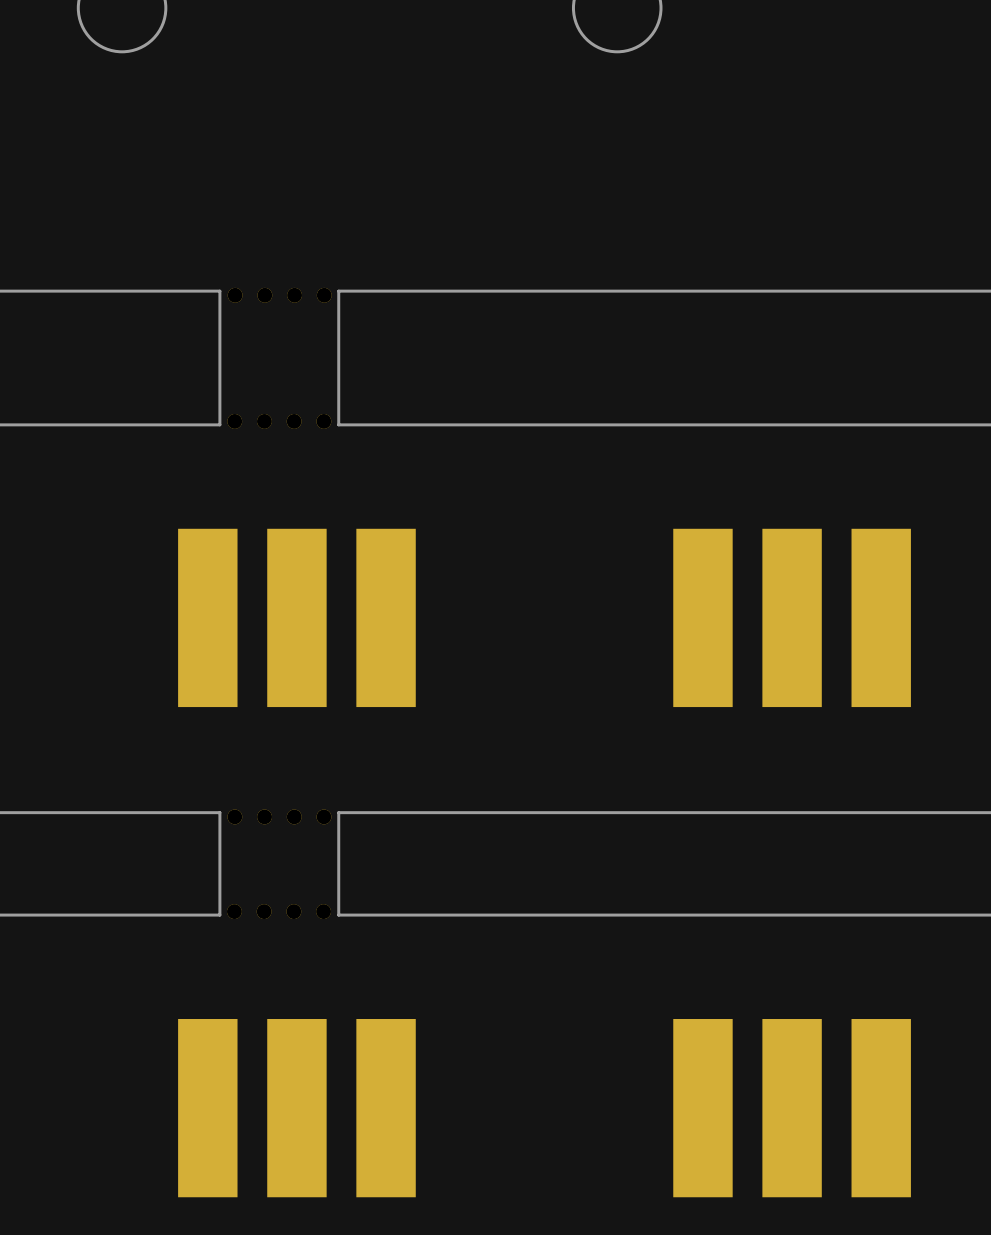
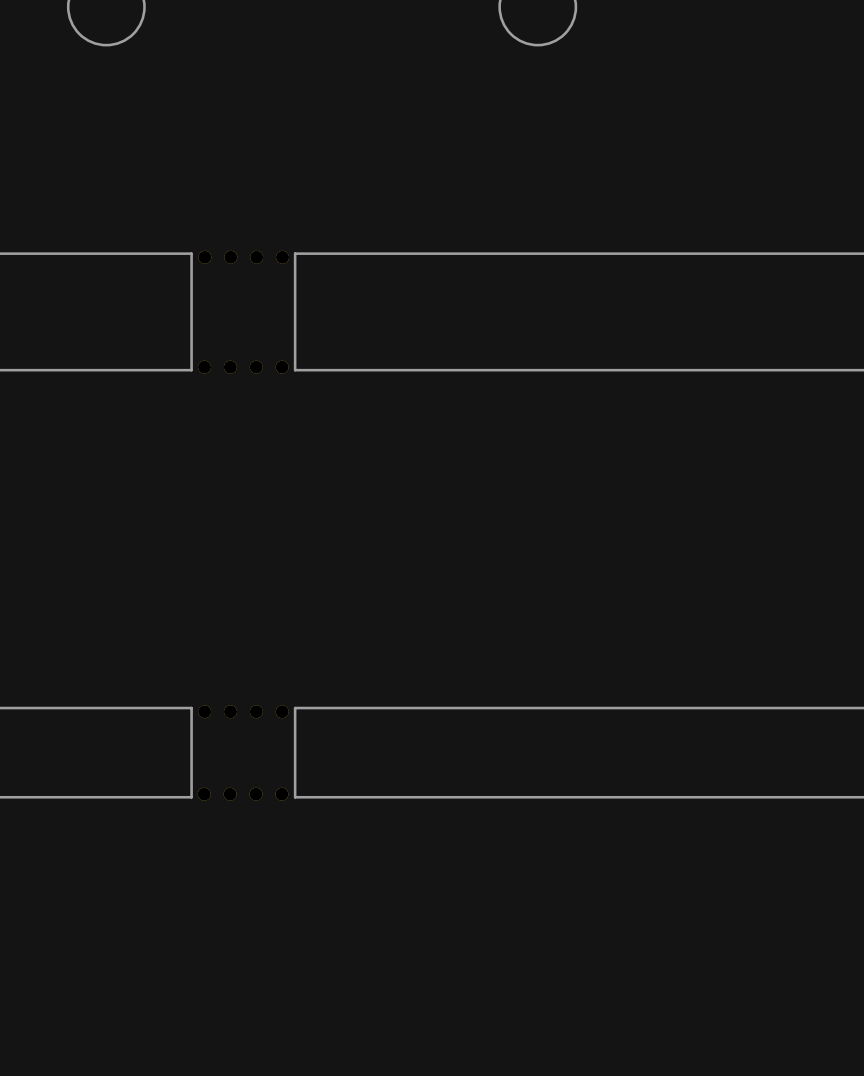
part: (296, 617) -> none
part: (792, 617) -> none
part: (296, 1108) -> none
part: (792, 1108) -> none

